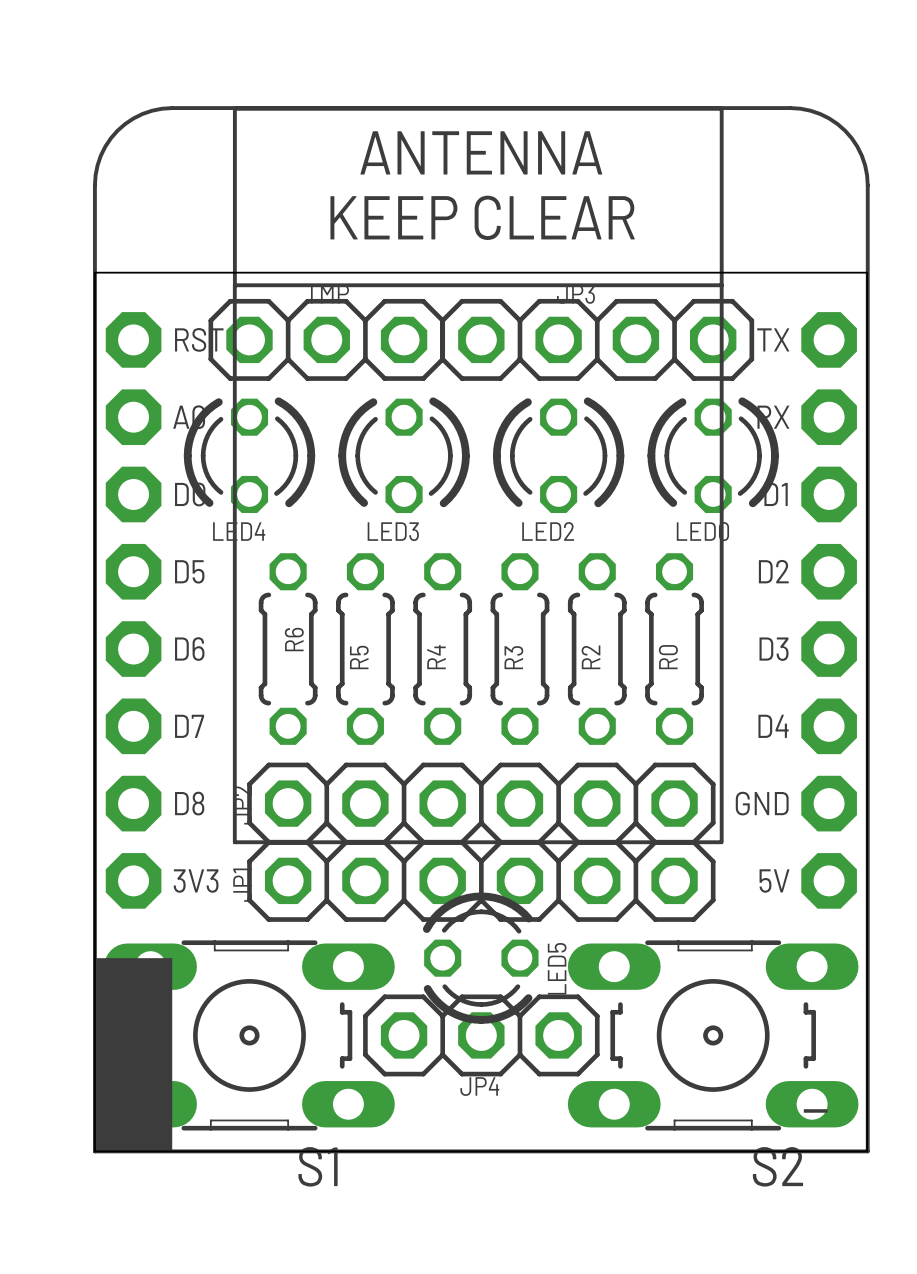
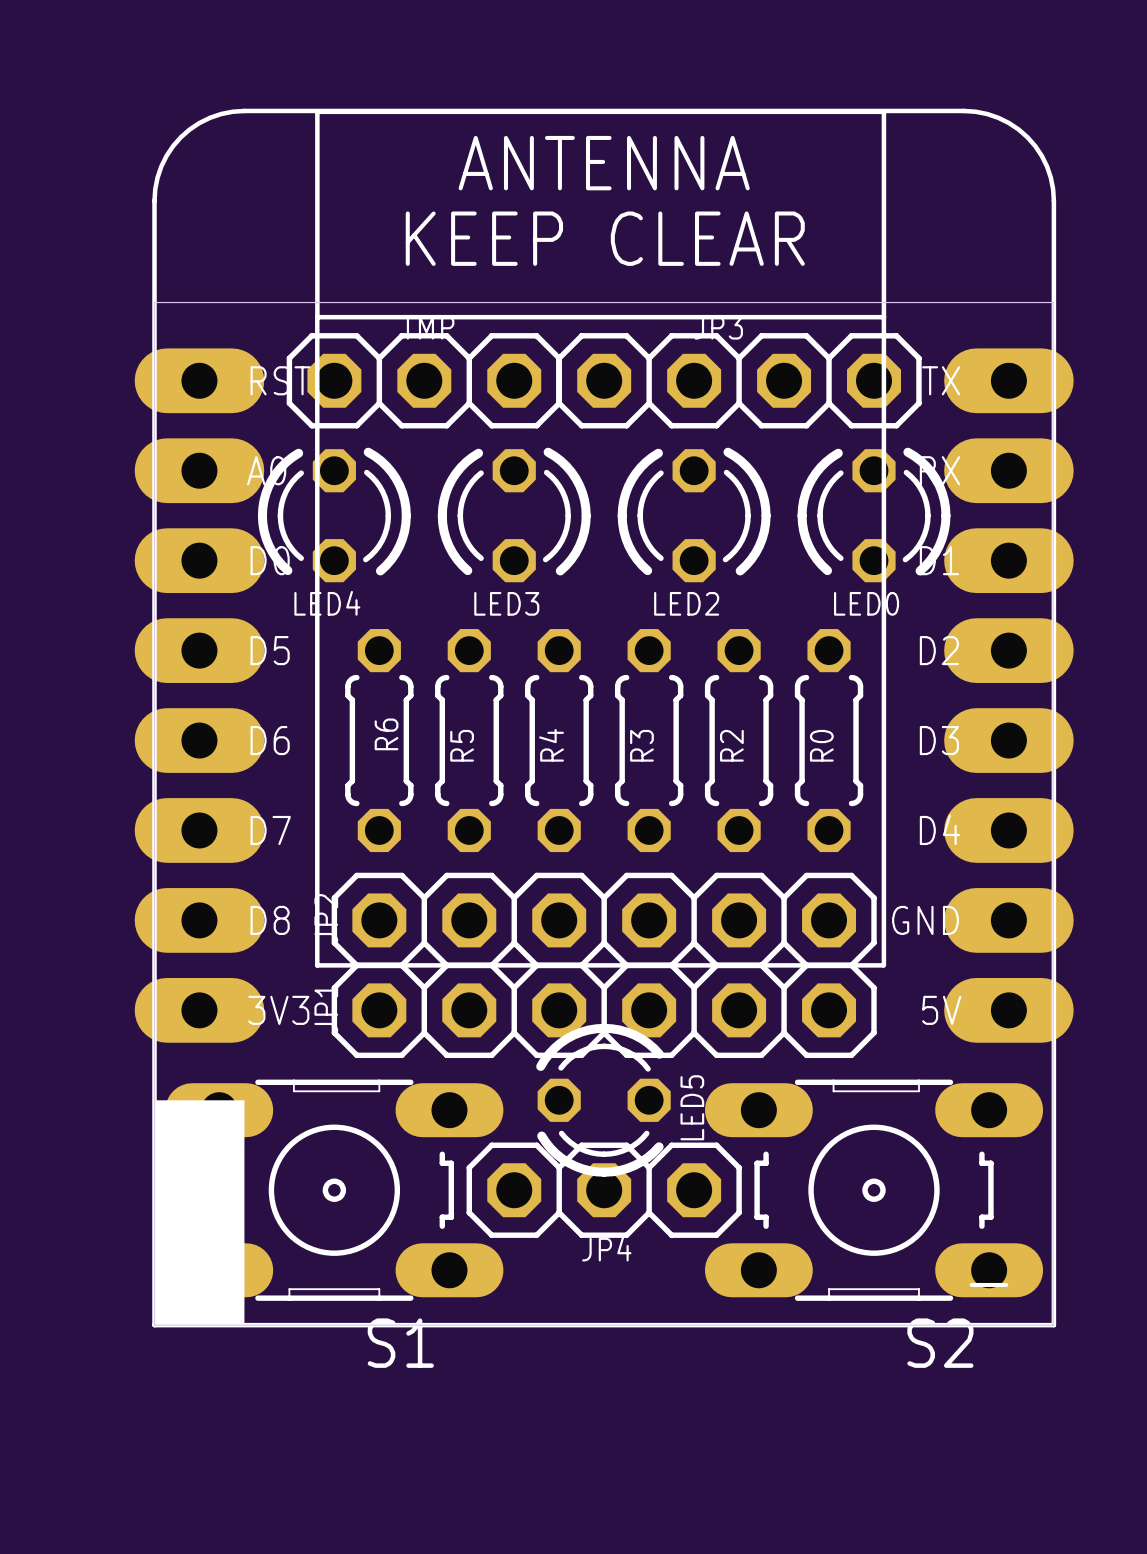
part footprint: [92, 106, 870, 1154] -> [134, 108, 1074, 1328]

